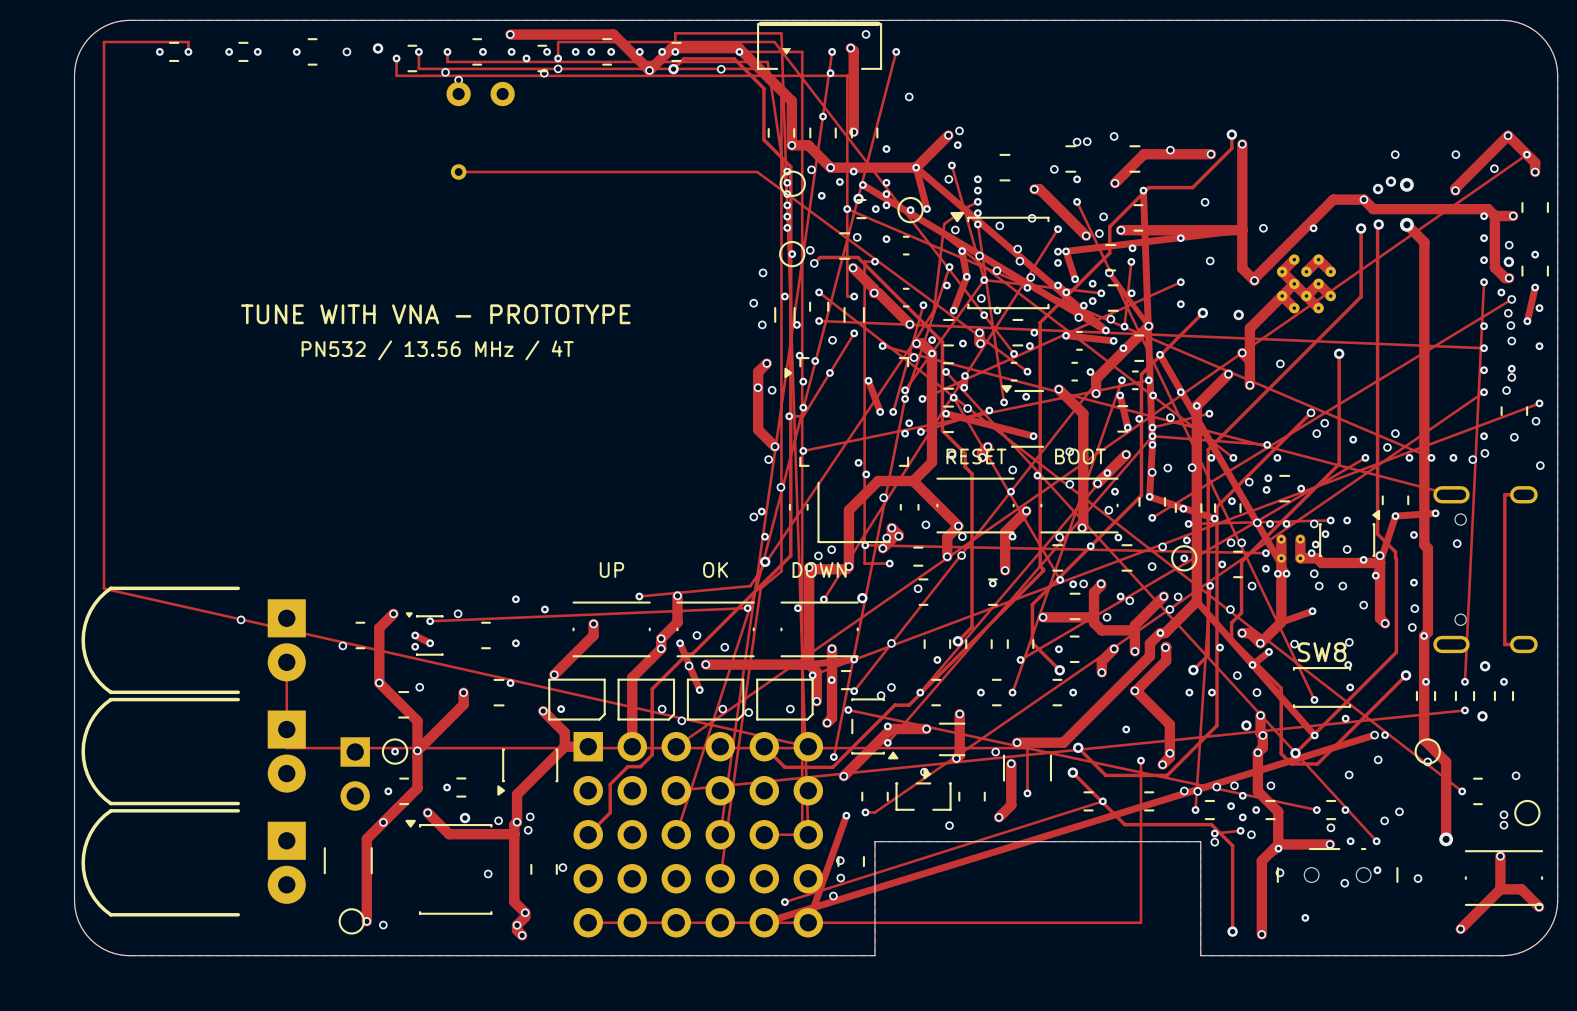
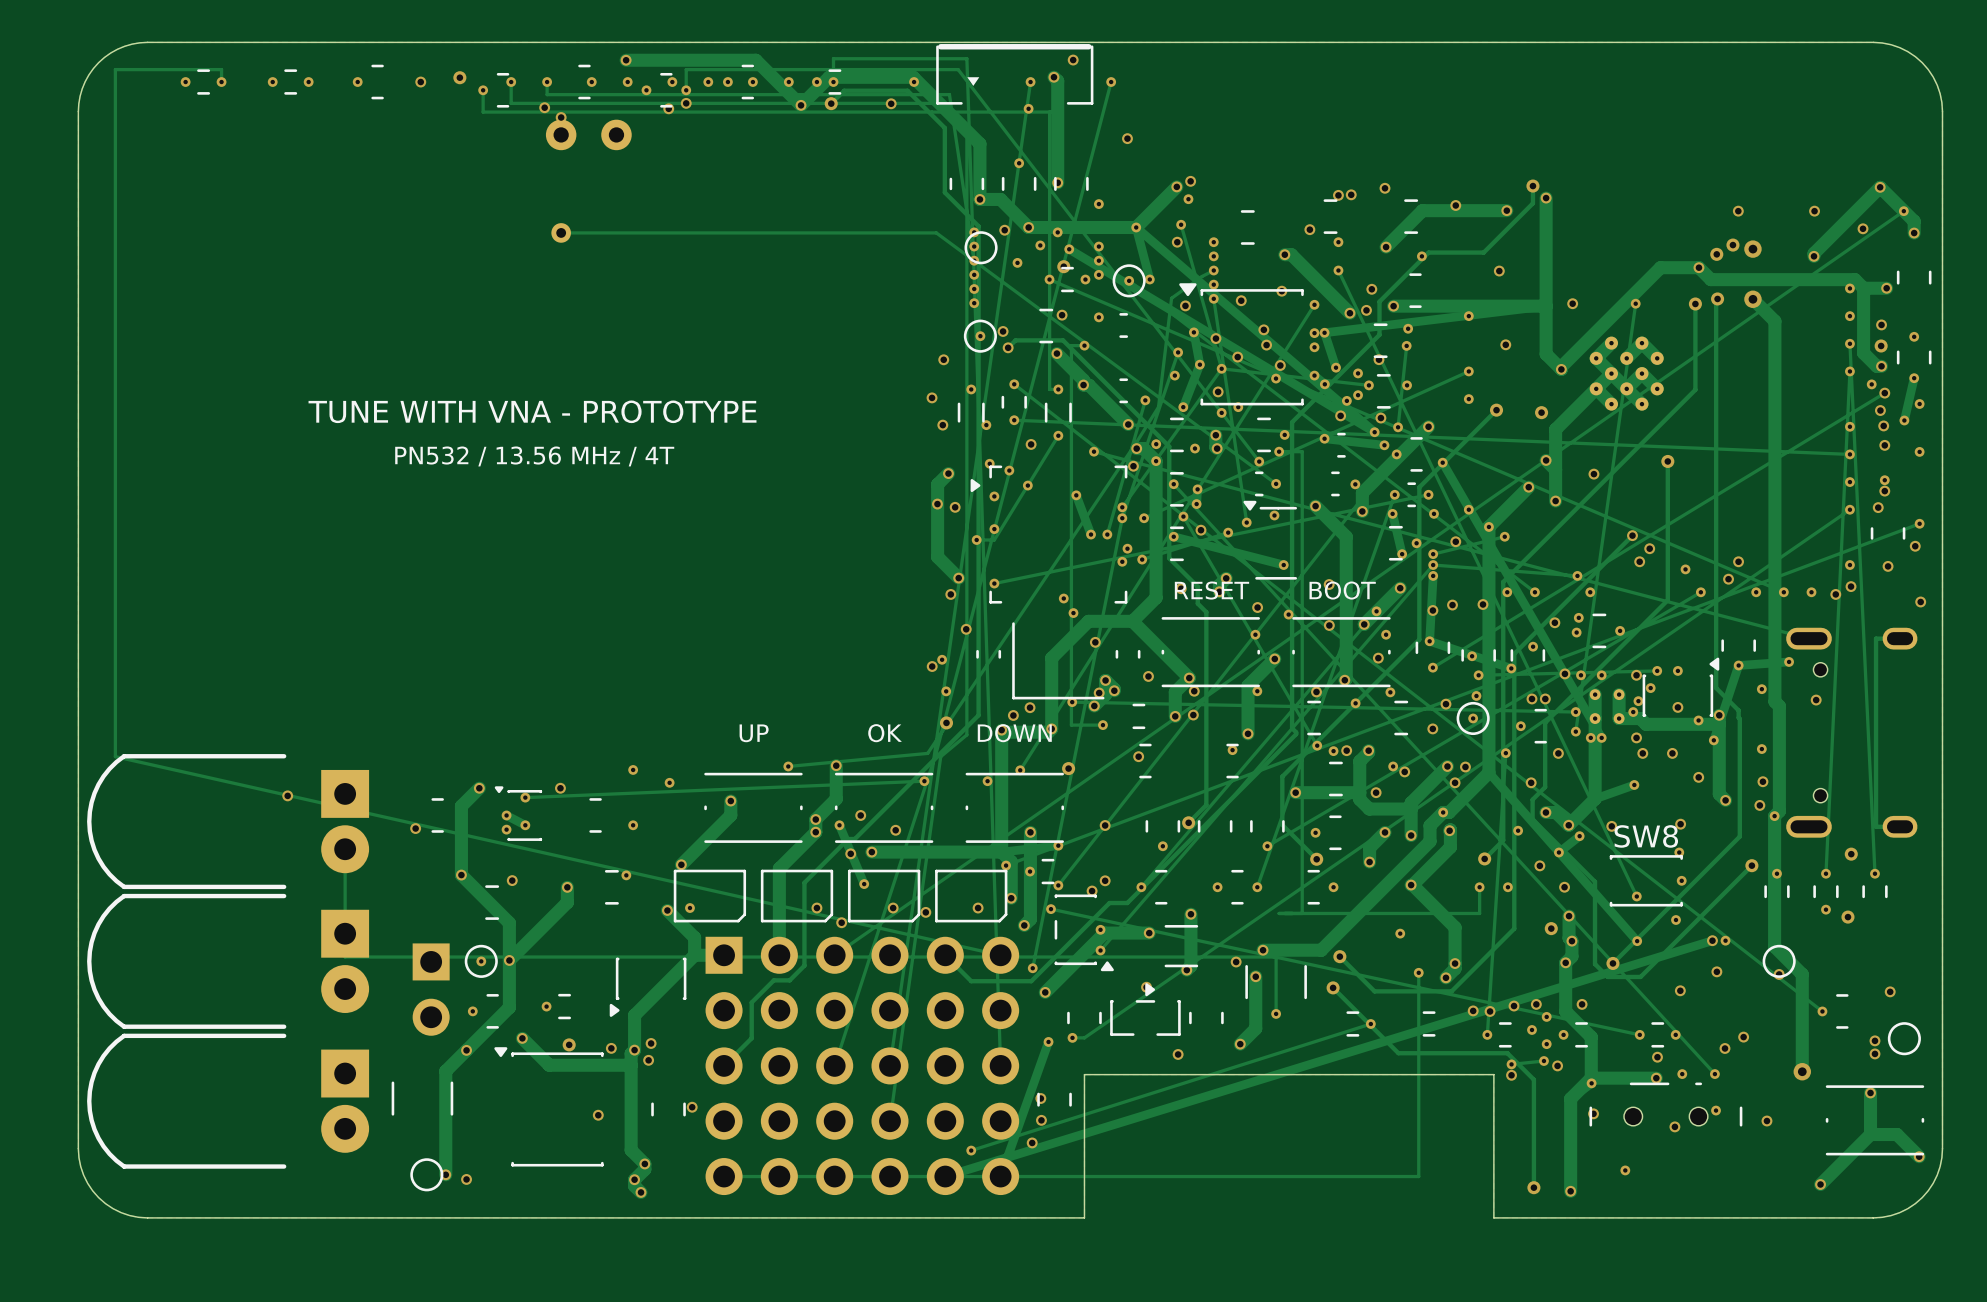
track: (739, 51) (802, 51) (802, 834) (764, 834) -> none
track: (1143, 190) (1152, 444) -> none
track: none -> (1635, 303) (1575, 731)
track: none -> (1849, 343) (1874, 873)
track: (1109, 272) (1148, 326) -> none
track: none -> (1279, 451) (1302, 451) (1302, 913)
track: none -> (1479, 887) (1479, 913) (1279, 913)
track: (1464, 710) (676, 790) -> none

